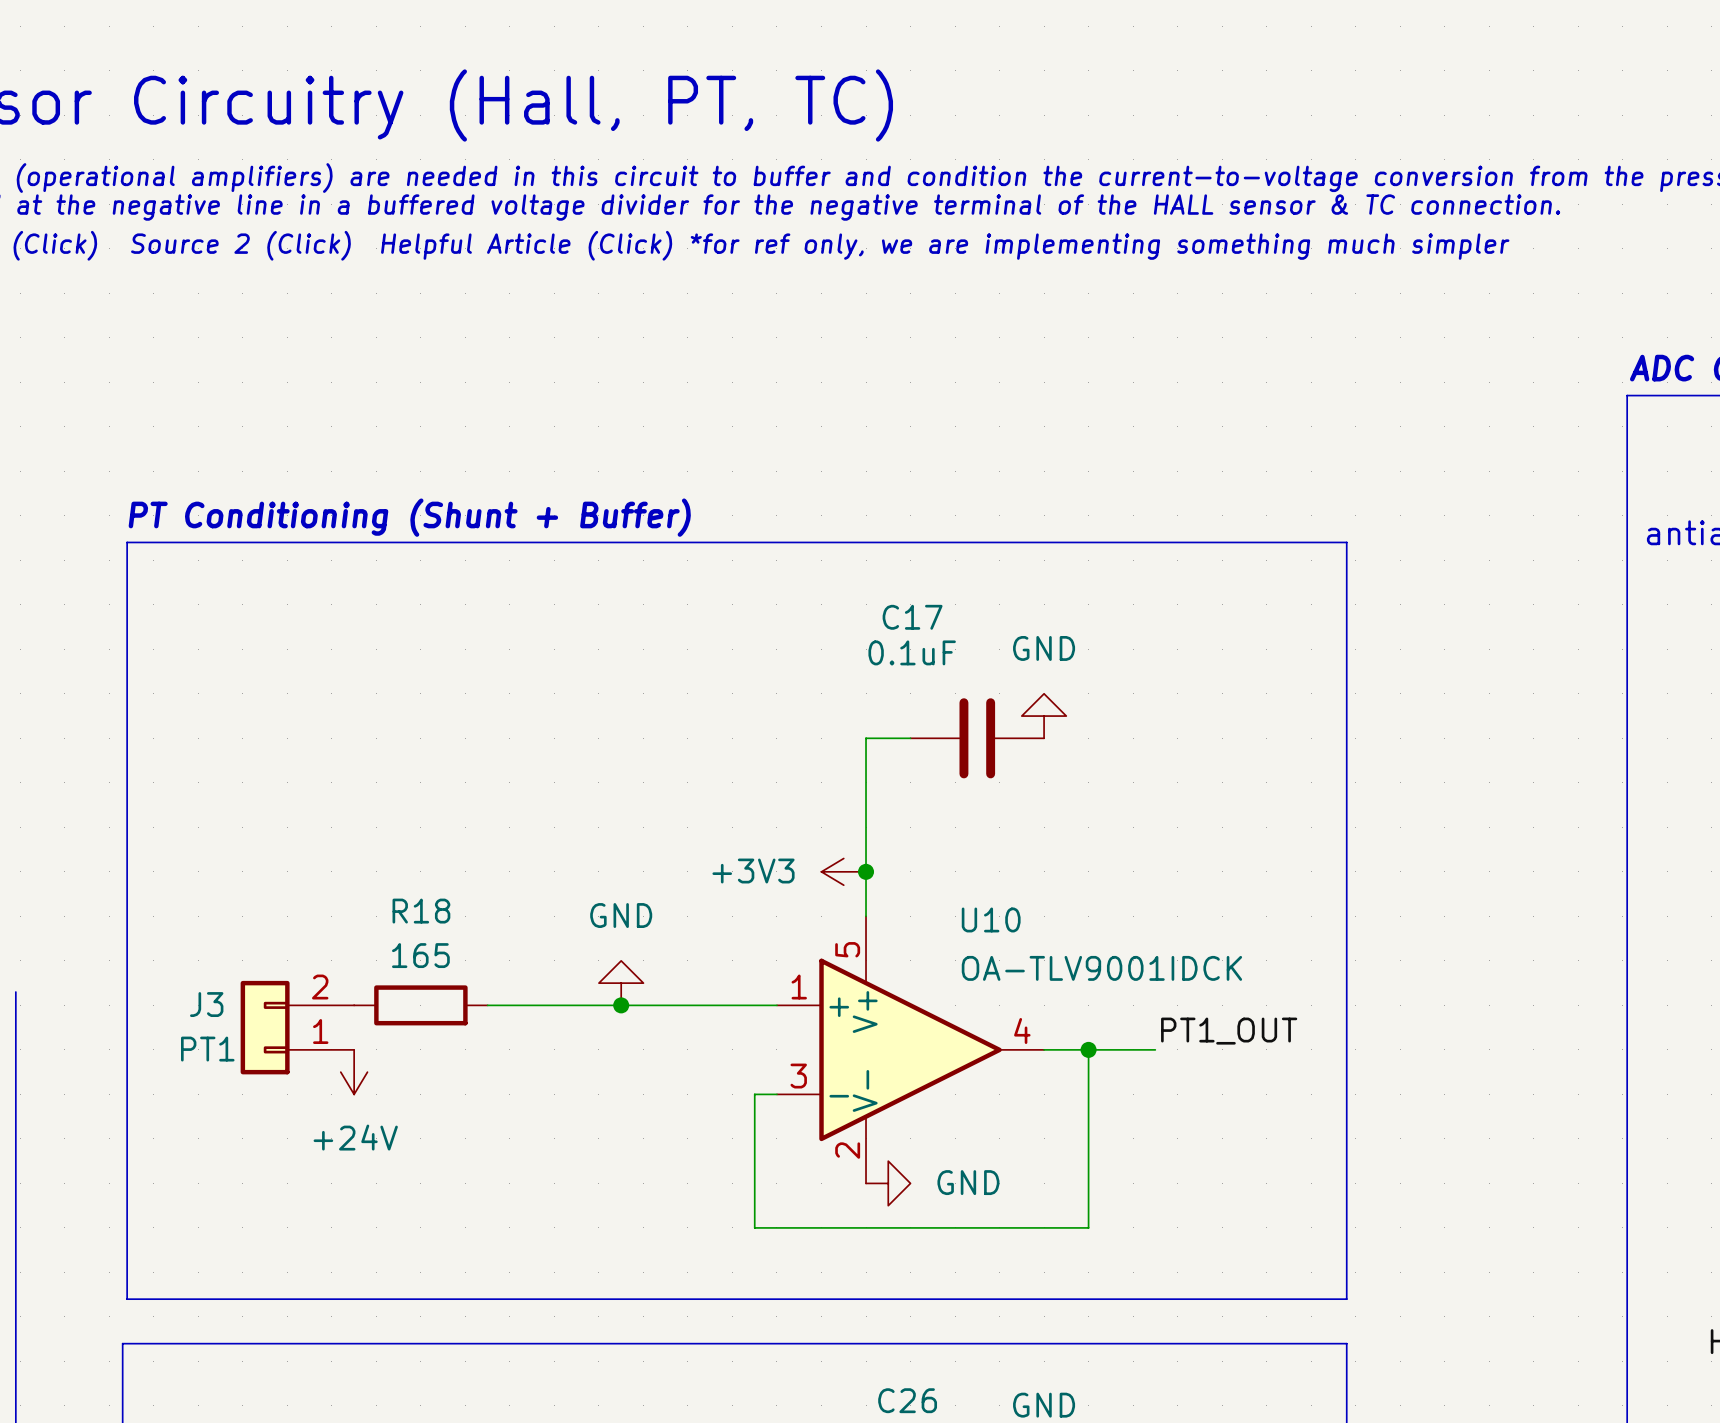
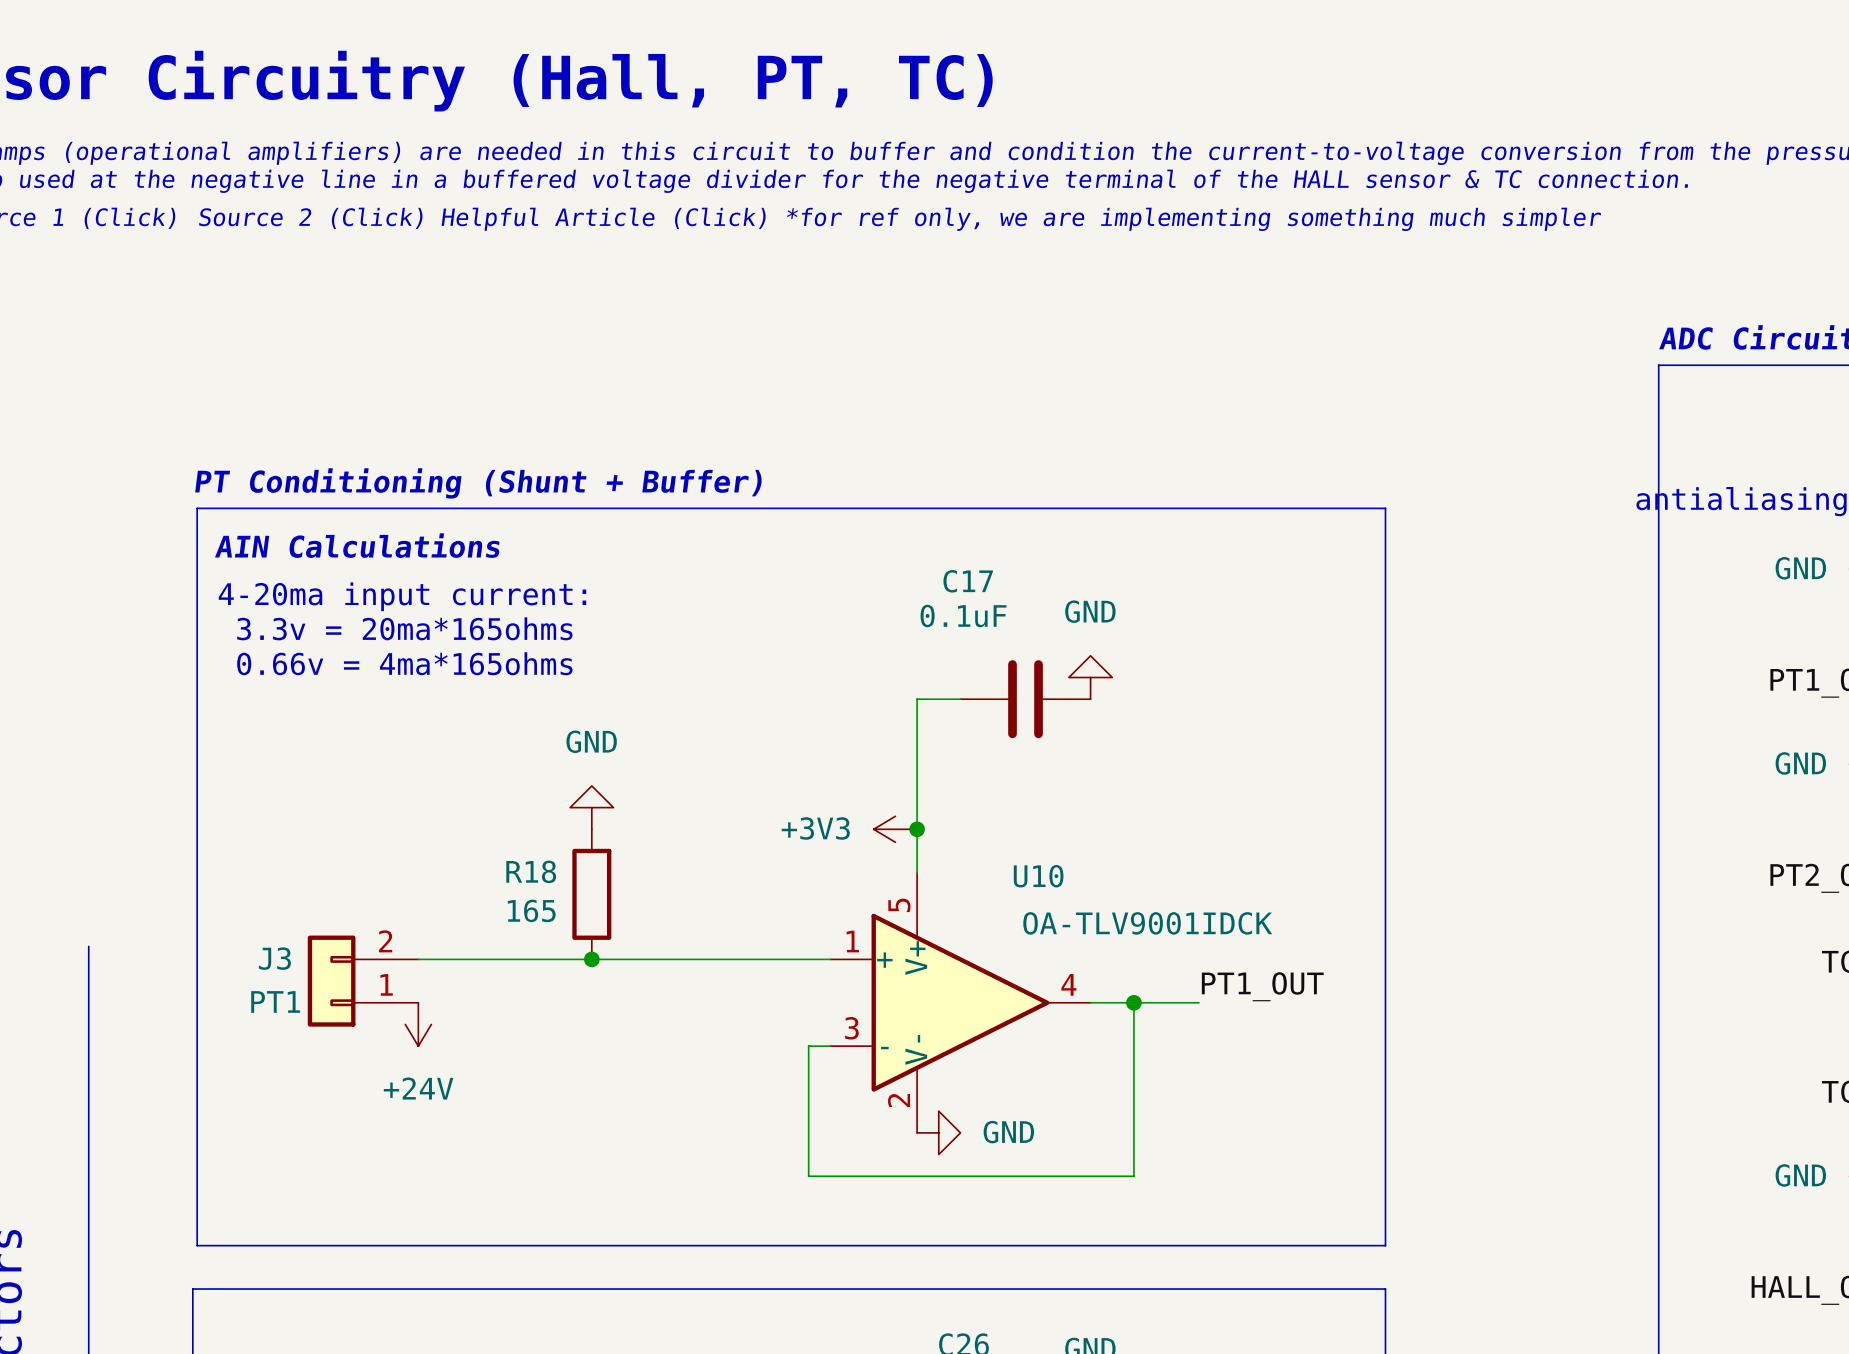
text: none -> AIN Calculations (357, 545)
text: none -> 4-20ma input current: (402, 596)
text: none -> 3.3v = 20ma*165ohms (404, 628)
text: none -> 0.66v = 4ma*165ohms (404, 663)
R18 name position: R18 (421, 911) -> R18 (531, 871)
R18 value position: 165 (420, 955) -> 165 (531, 910)
power symbol position: GND (621, 983) -> GND (591, 807)
wire: none -> (418, 959) (548, 959)
R18 rotation: 0° (420, 1005) -> 90° clockwise (591, 894)
R18 position: (420, 1005) -> (591, 894)
junction position: (621, 1005) -> (591, 959)

